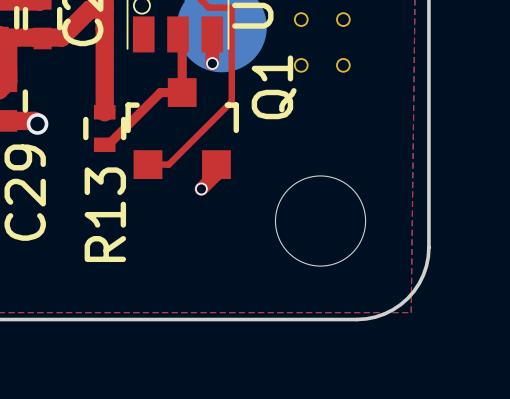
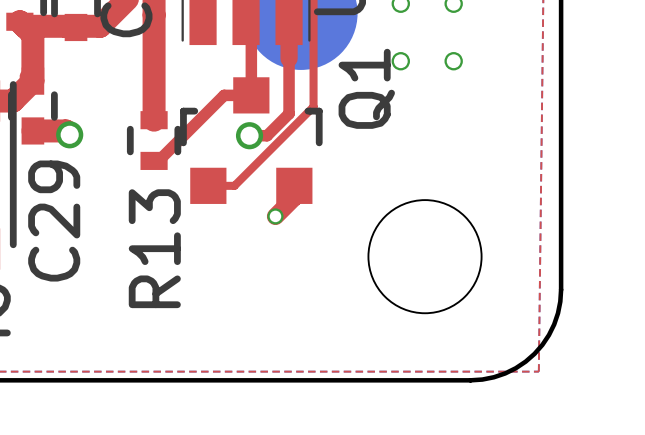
top track: none -> (289, 58) (289, 113) (267, 135) (249, 135)
via: (212, 63) -> none
via: none -> (249, 135)

